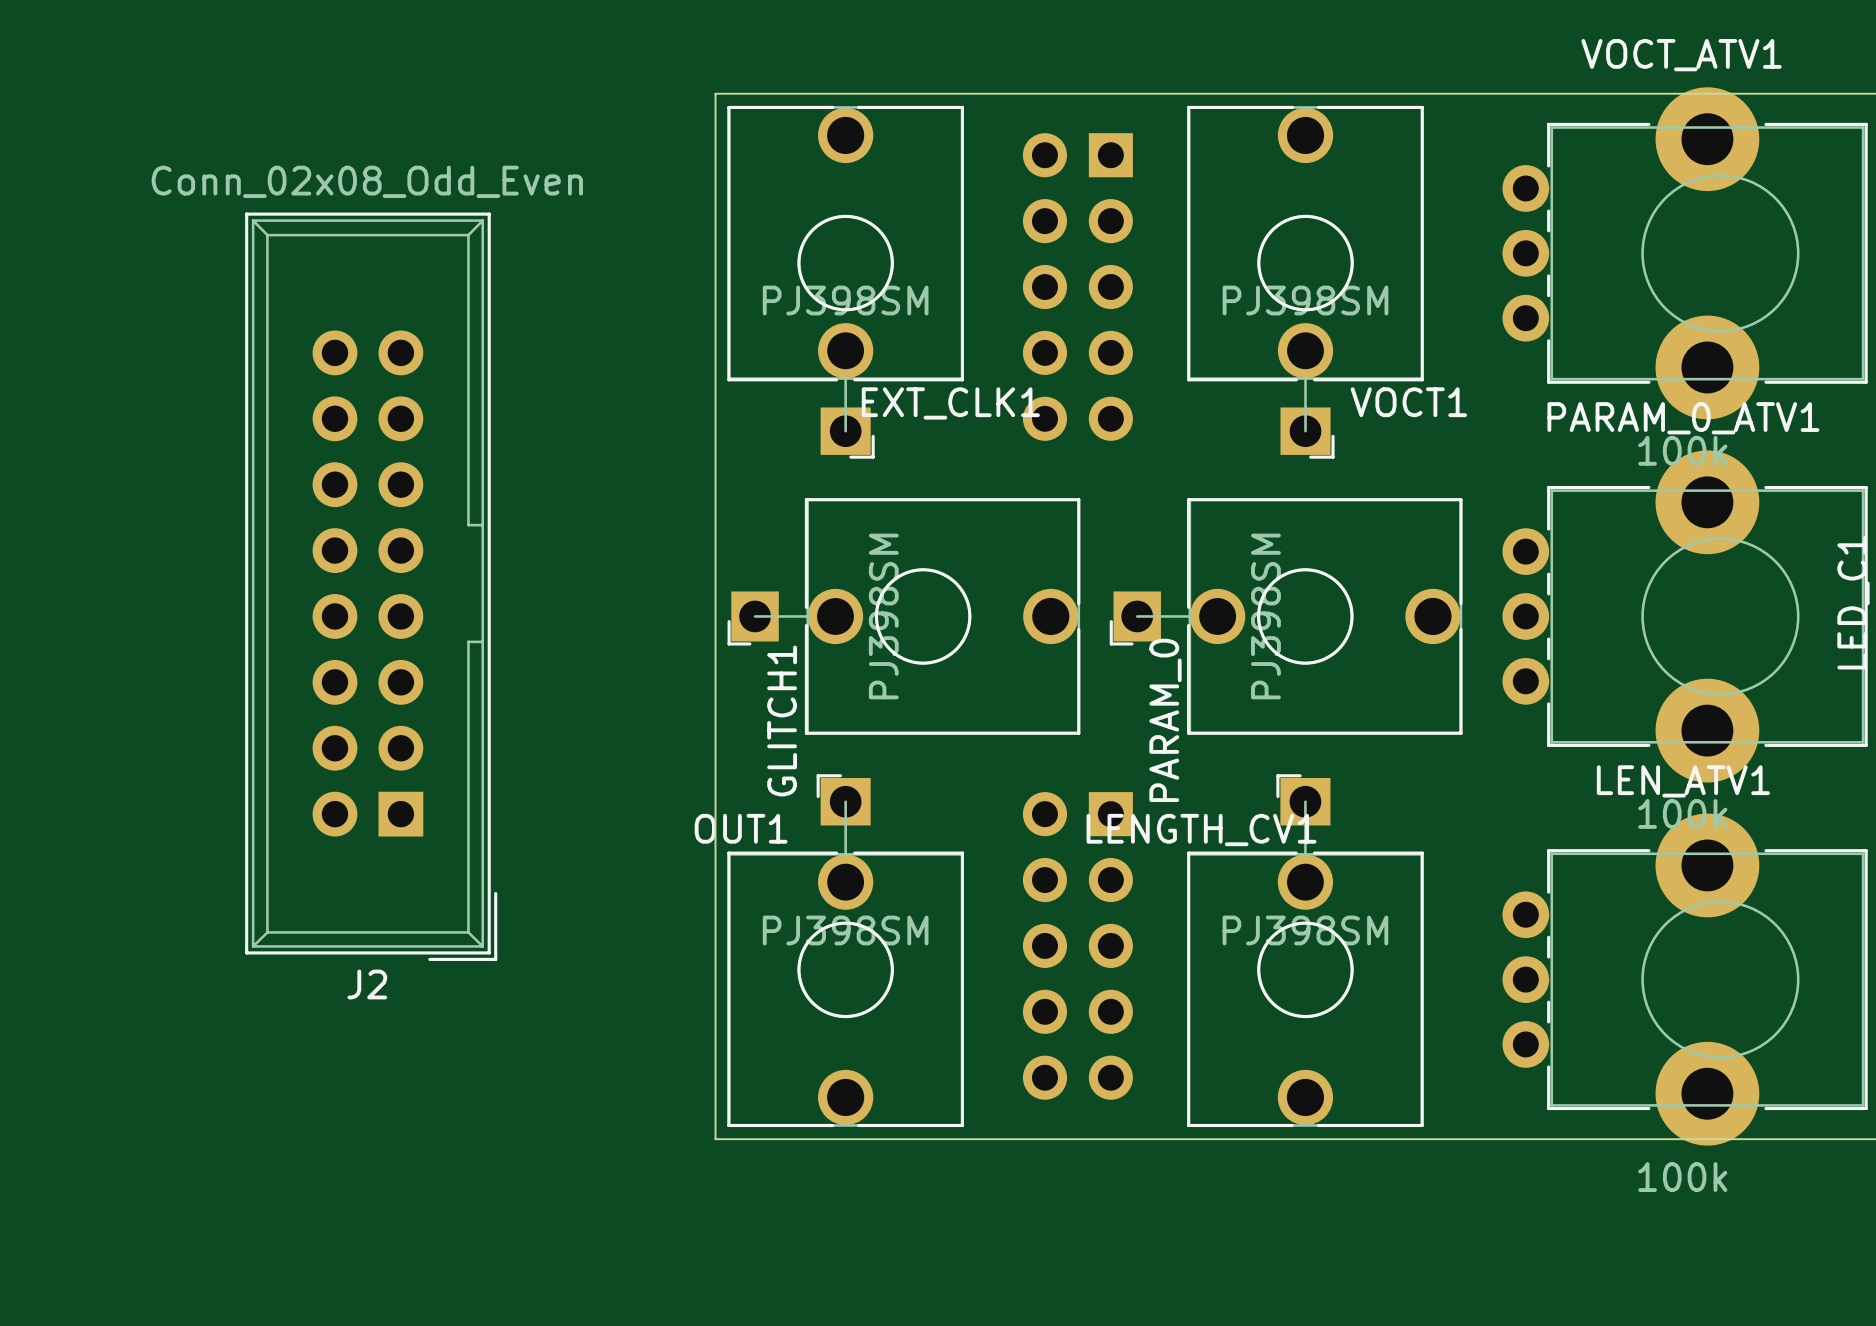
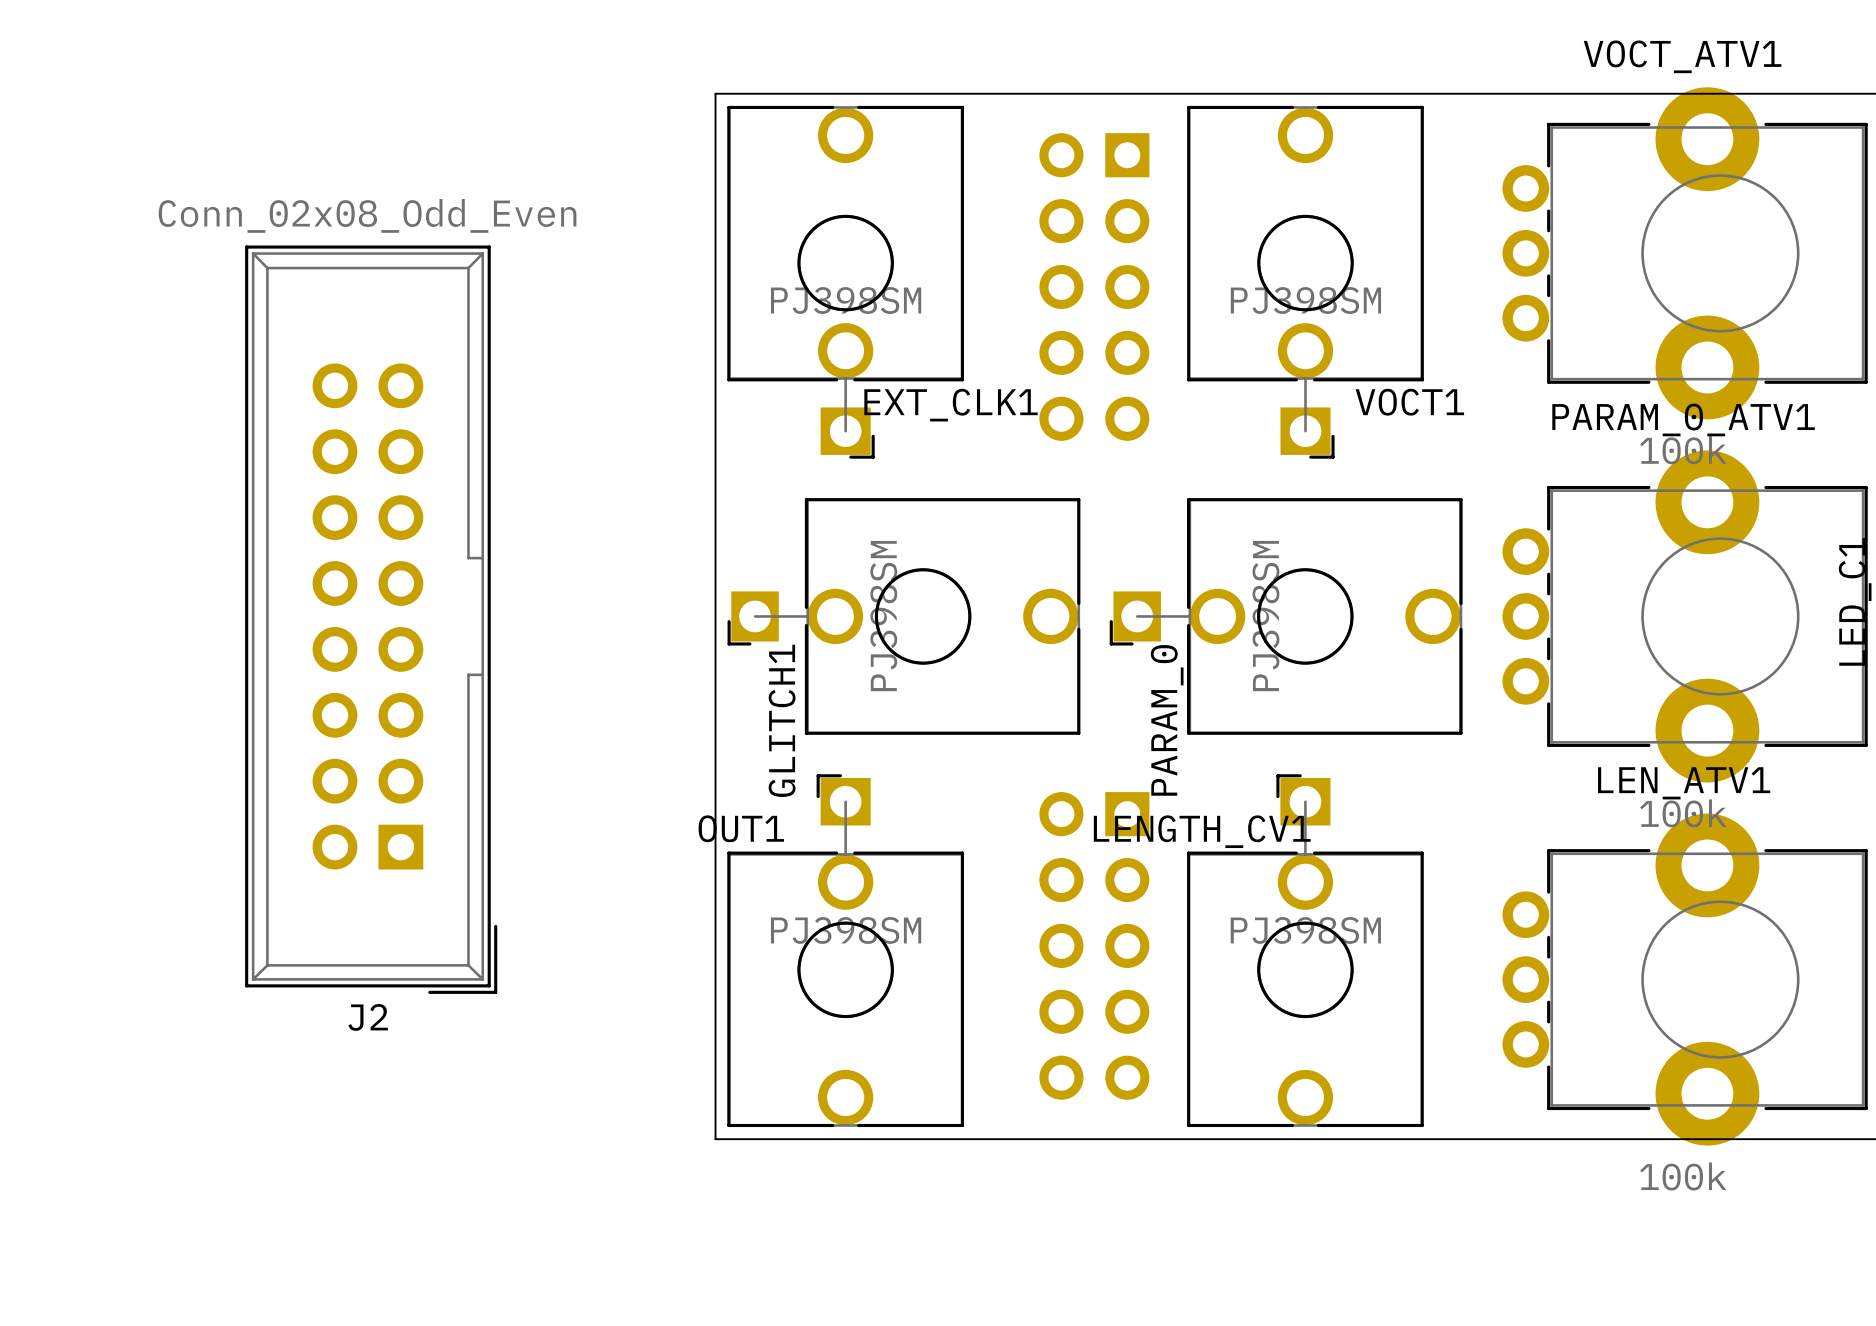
part position: (1077, 287) -> (1094, 287)
J2 position: (371, 586) -> (371, 619)
part position: (1077, 945) -> (1094, 945)

